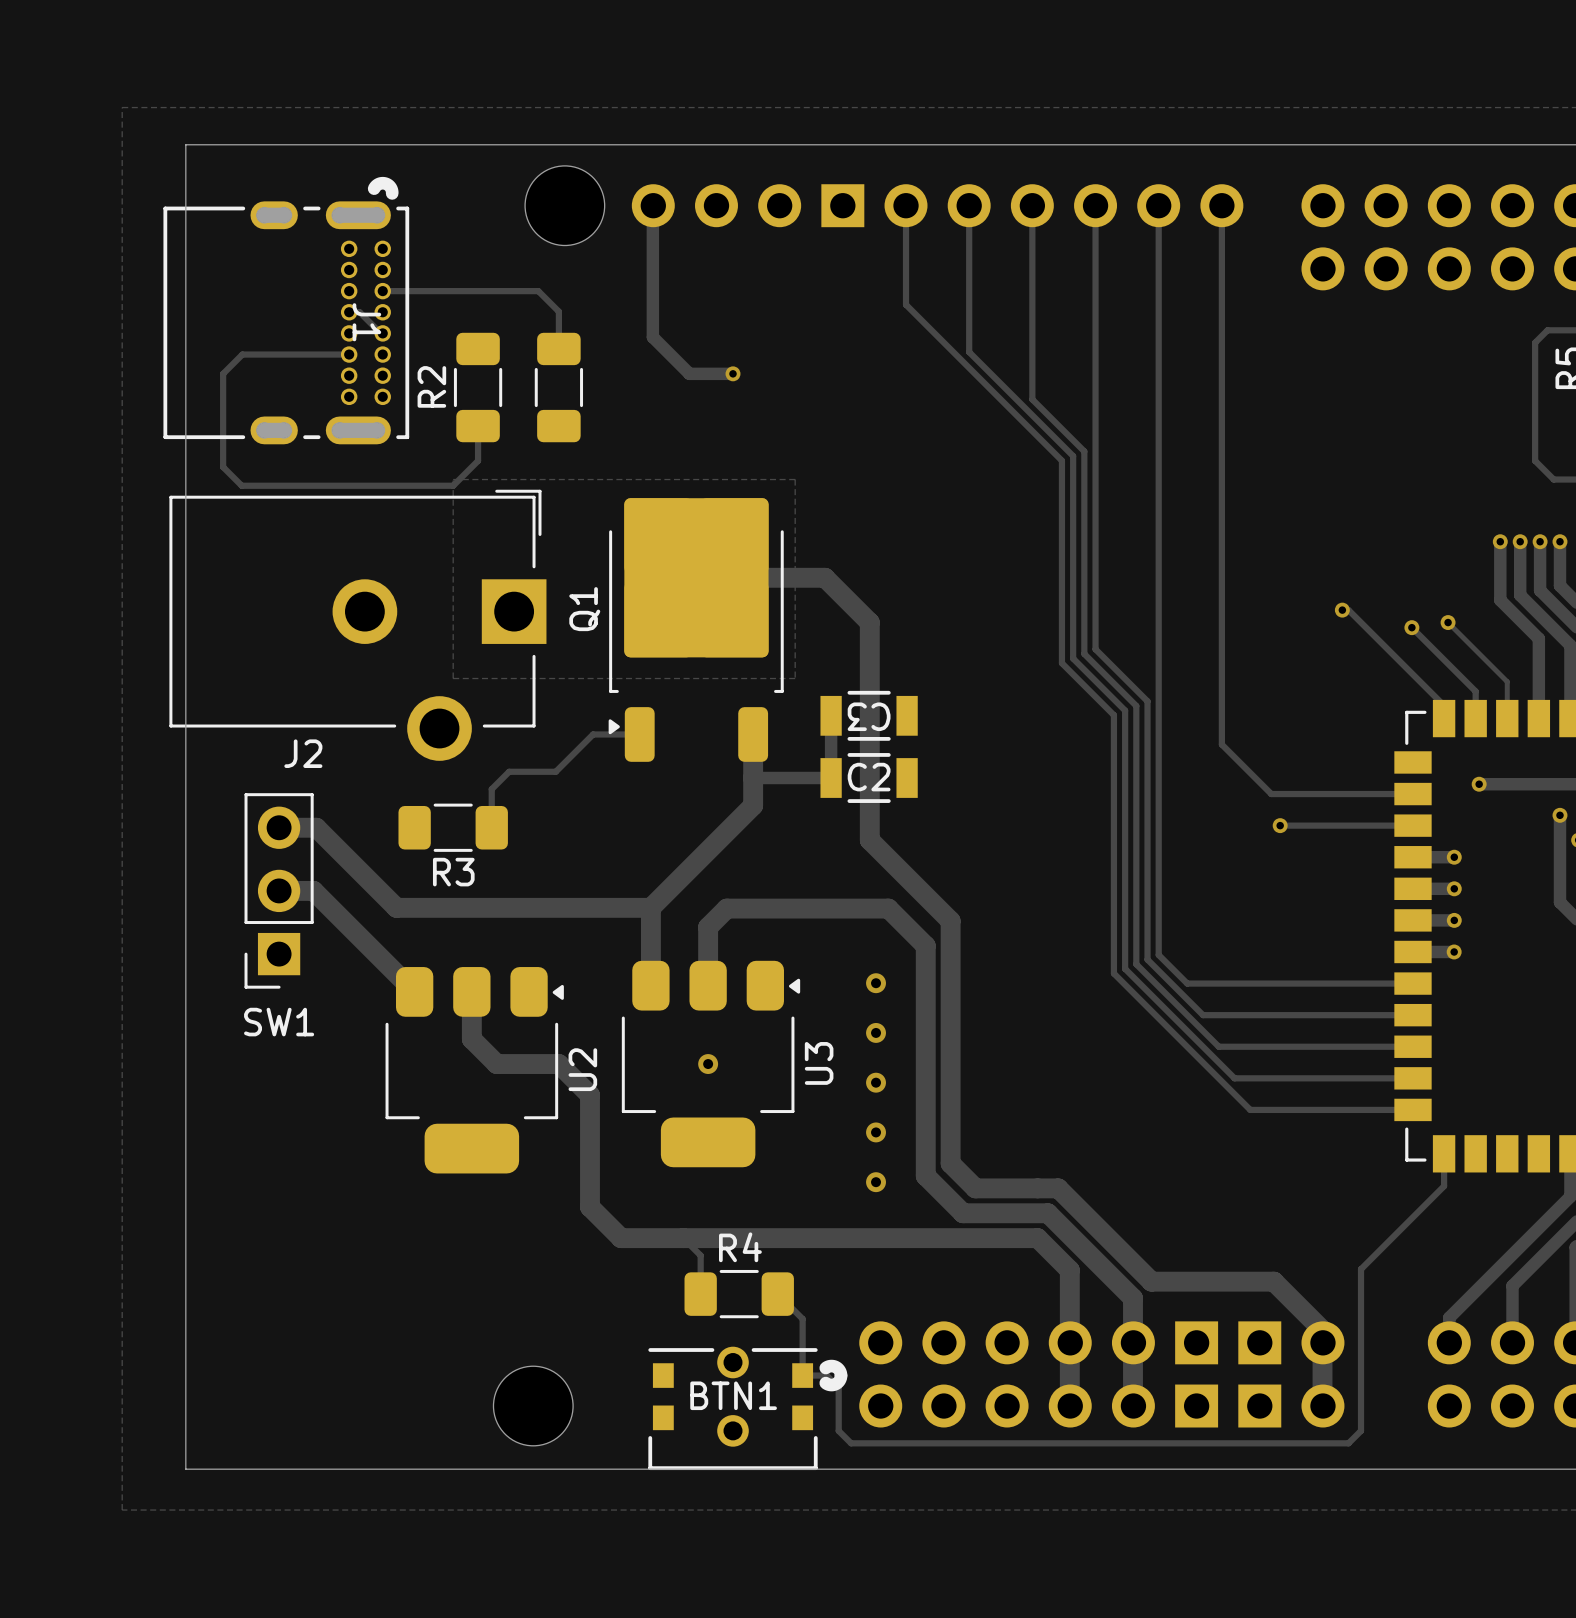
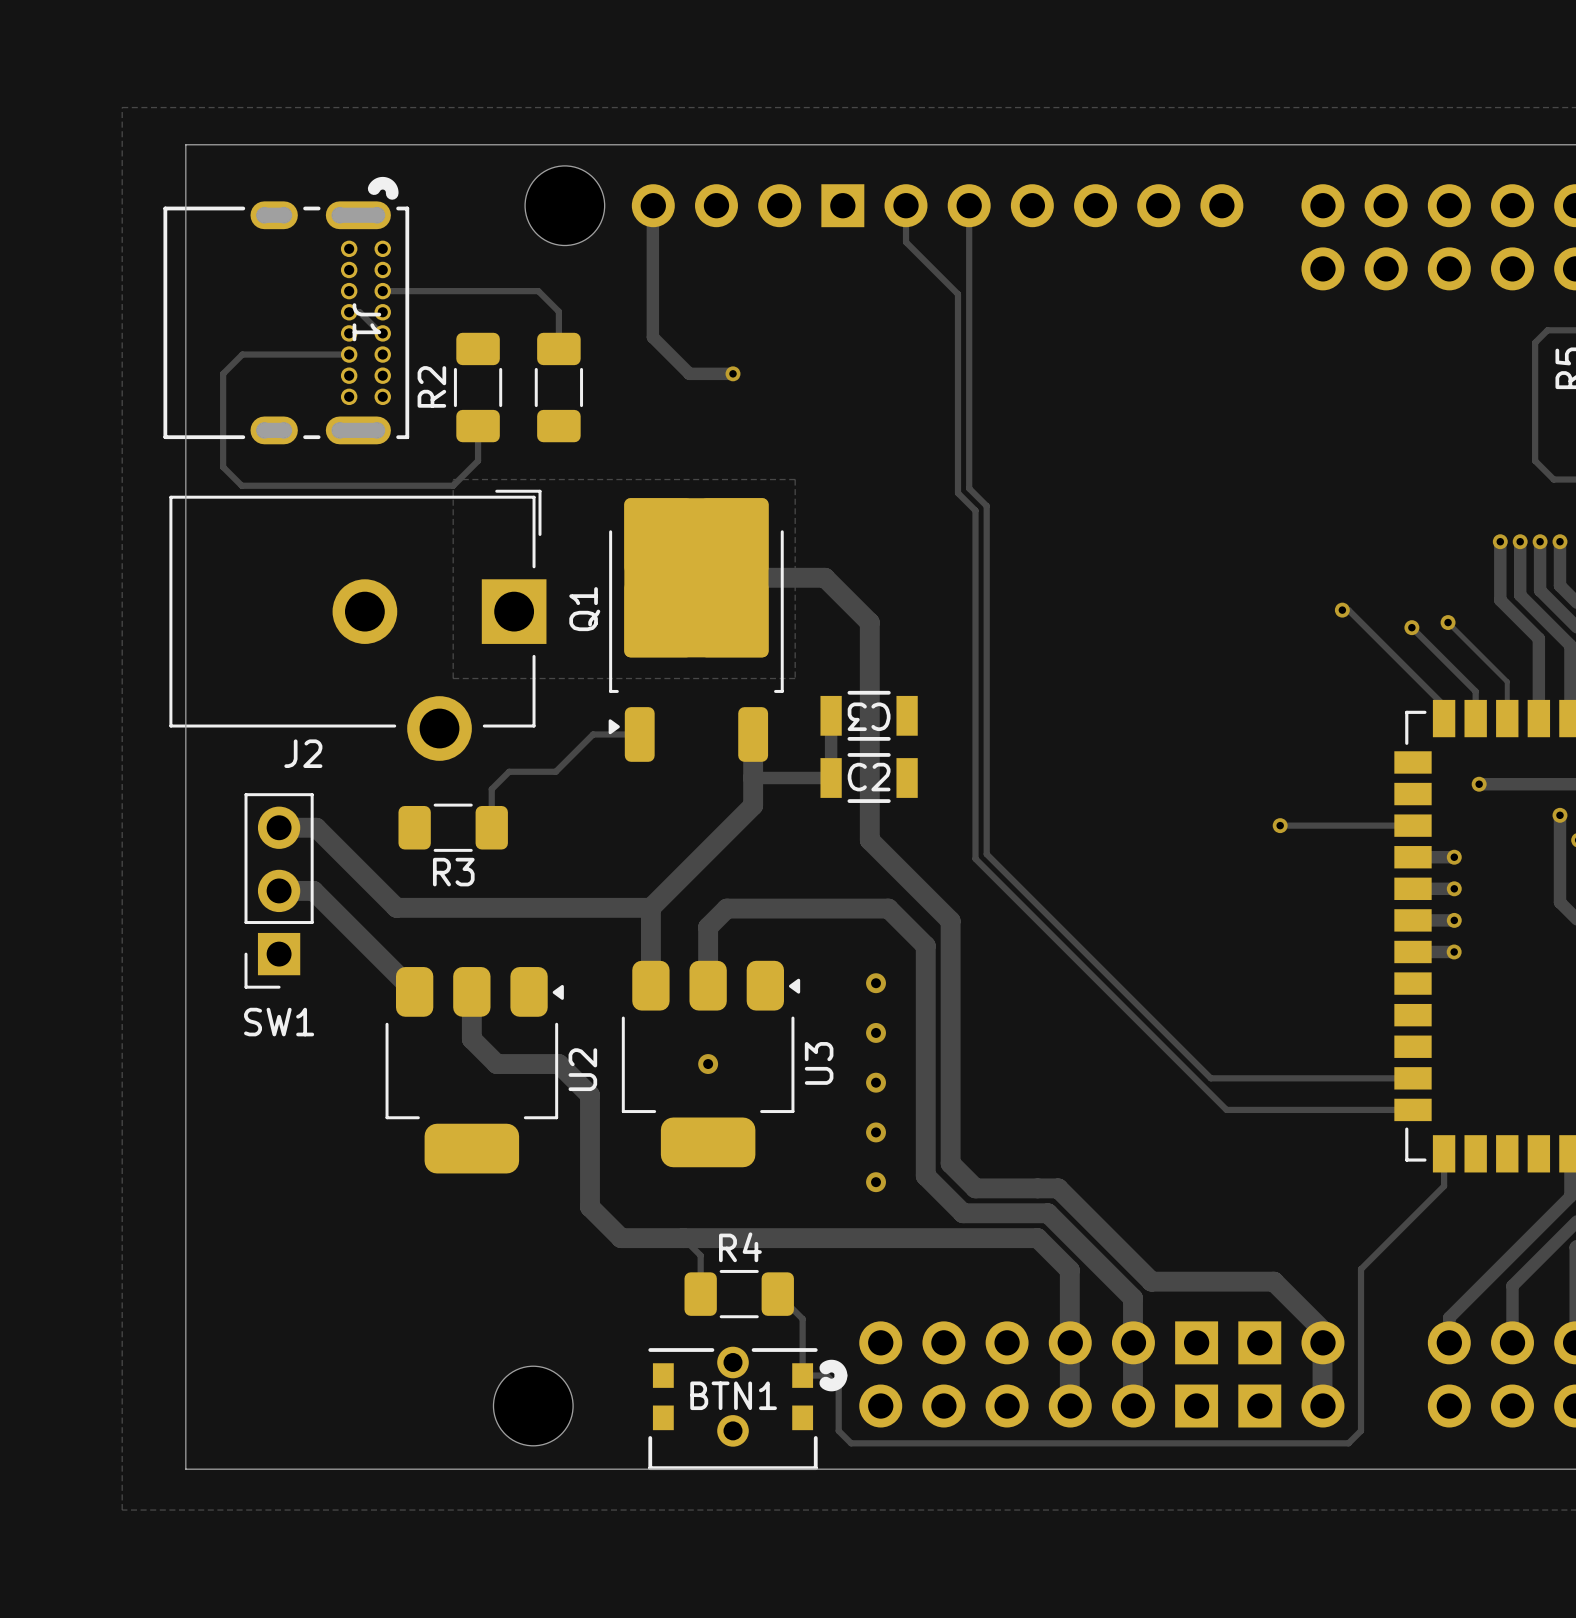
track: (1032, 205) (1032, 399) (1084, 451) (1084, 653) (1136, 705) (1136, 964) (1218, 1046) (1413, 1046) -> none
track: (1095, 205) (1095, 649) (1147, 701) (1147, 959) (1203, 1015) (1413, 1015) -> none
track: (1158, 205) (1158, 954) (1187, 983) (1413, 983) -> none
track: (1221, 205) (1221, 744) (1271, 794) (1413, 794) -> none
track: (906, 242) (906, 304) (1061, 460) (1061, 663) (1113, 715) (1113, 973) (1250, 1109) -> (906, 242) (957, 294) (957, 493) (975, 510) (975, 858) (1226, 1109) (1250, 1109)
track: (969, 352) (1073, 456) (1073, 658) (1125, 710) (1125, 968) (1234, 1078) -> (969, 352) (969, 488) (986, 505) (986, 854) (1210, 1078) (1234, 1078)

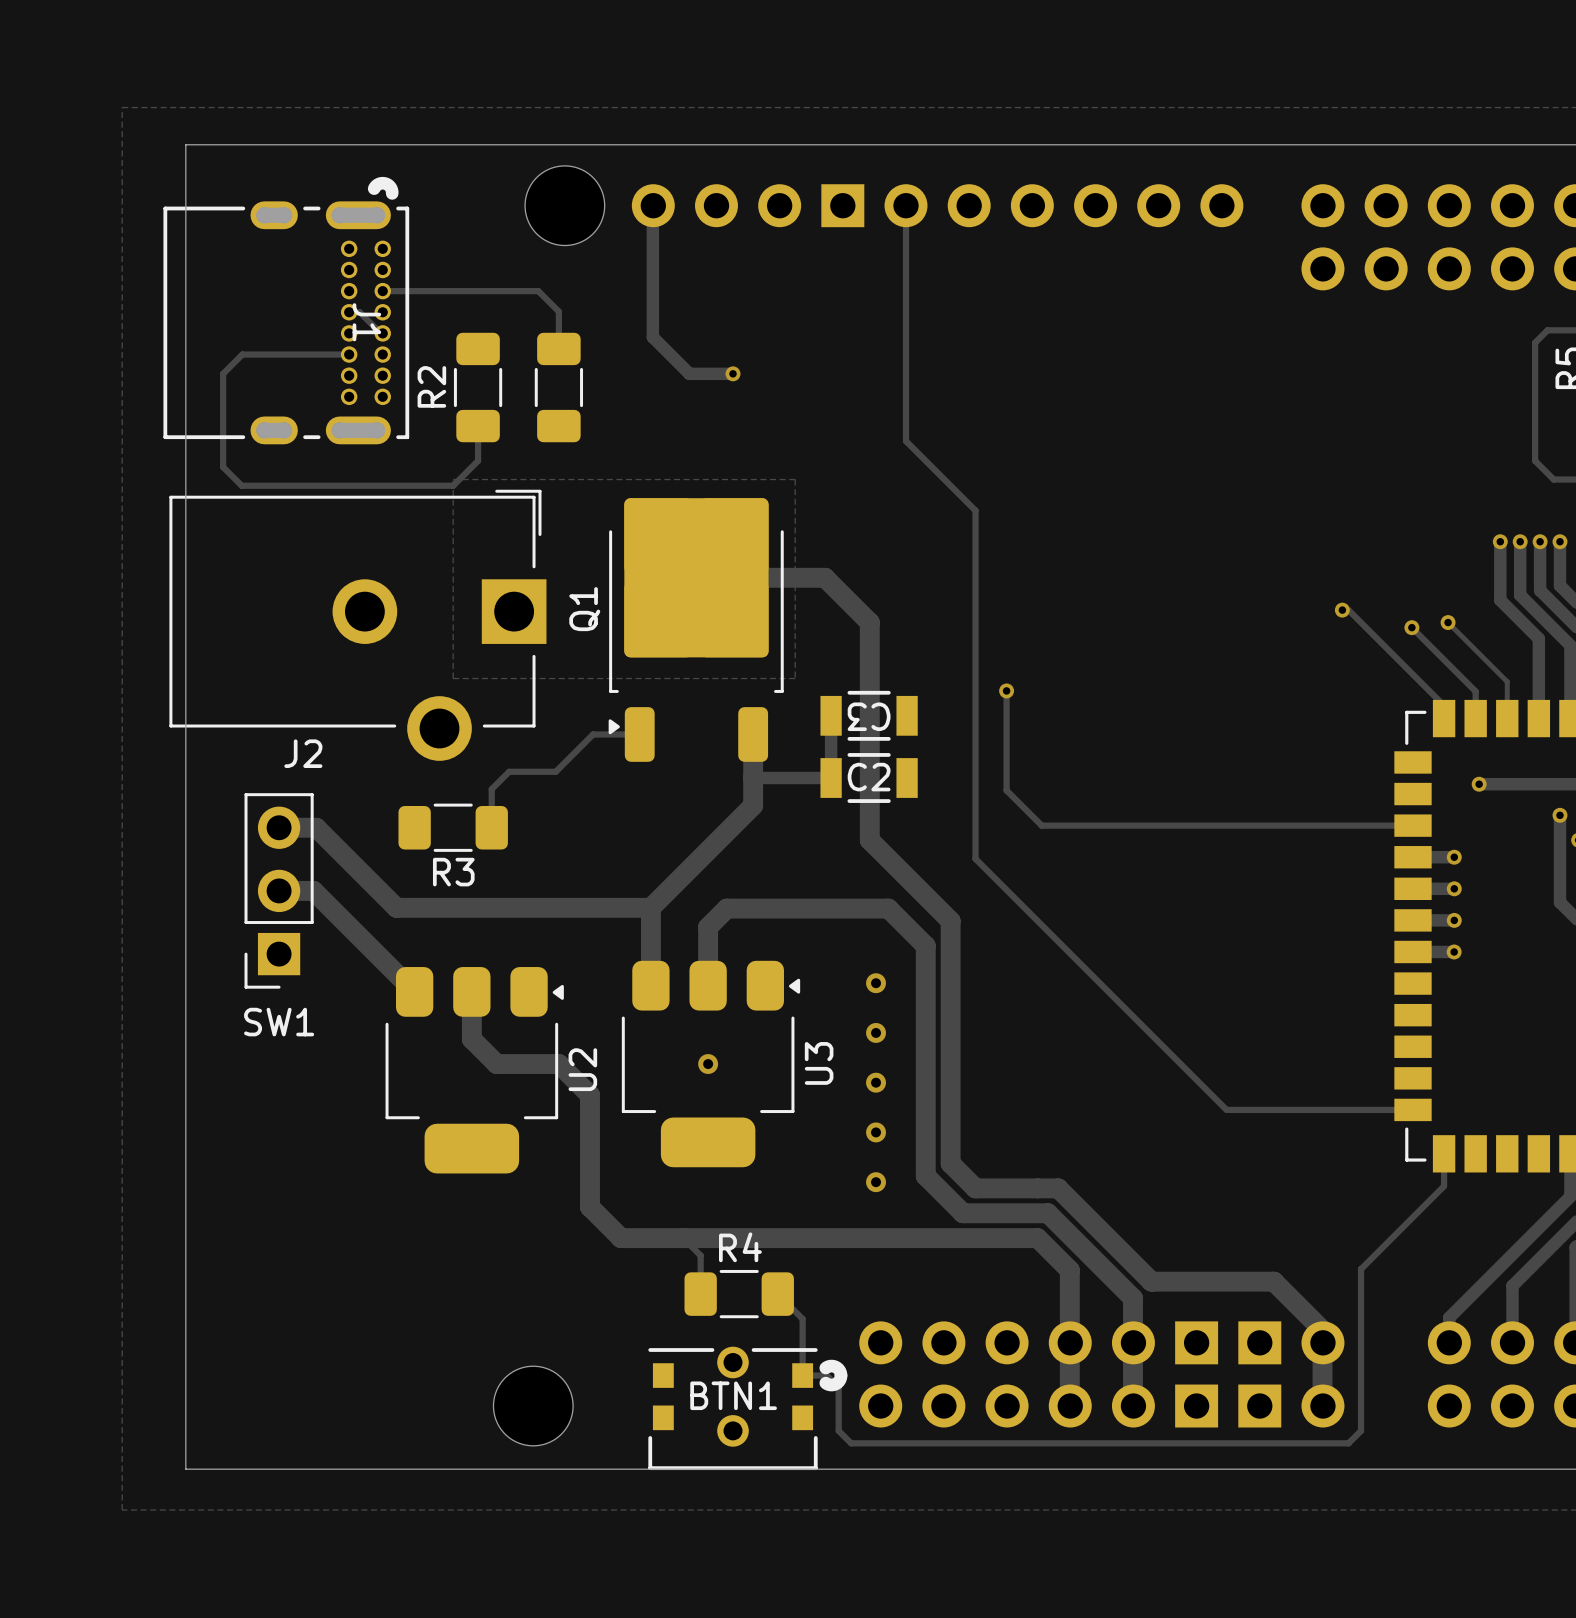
track: (969, 205) (969, 488) (986, 505) (986, 854) (1210, 1078) (1413, 1078) -> none
track: (906, 242) (957, 294) (957, 493) -> (906, 242) (906, 441) (957, 493)
track: none -> (1006, 690) (1006, 790) (1041, 825) (1280, 825)
via: none -> (1006, 690)
via: (1280, 825) -> none

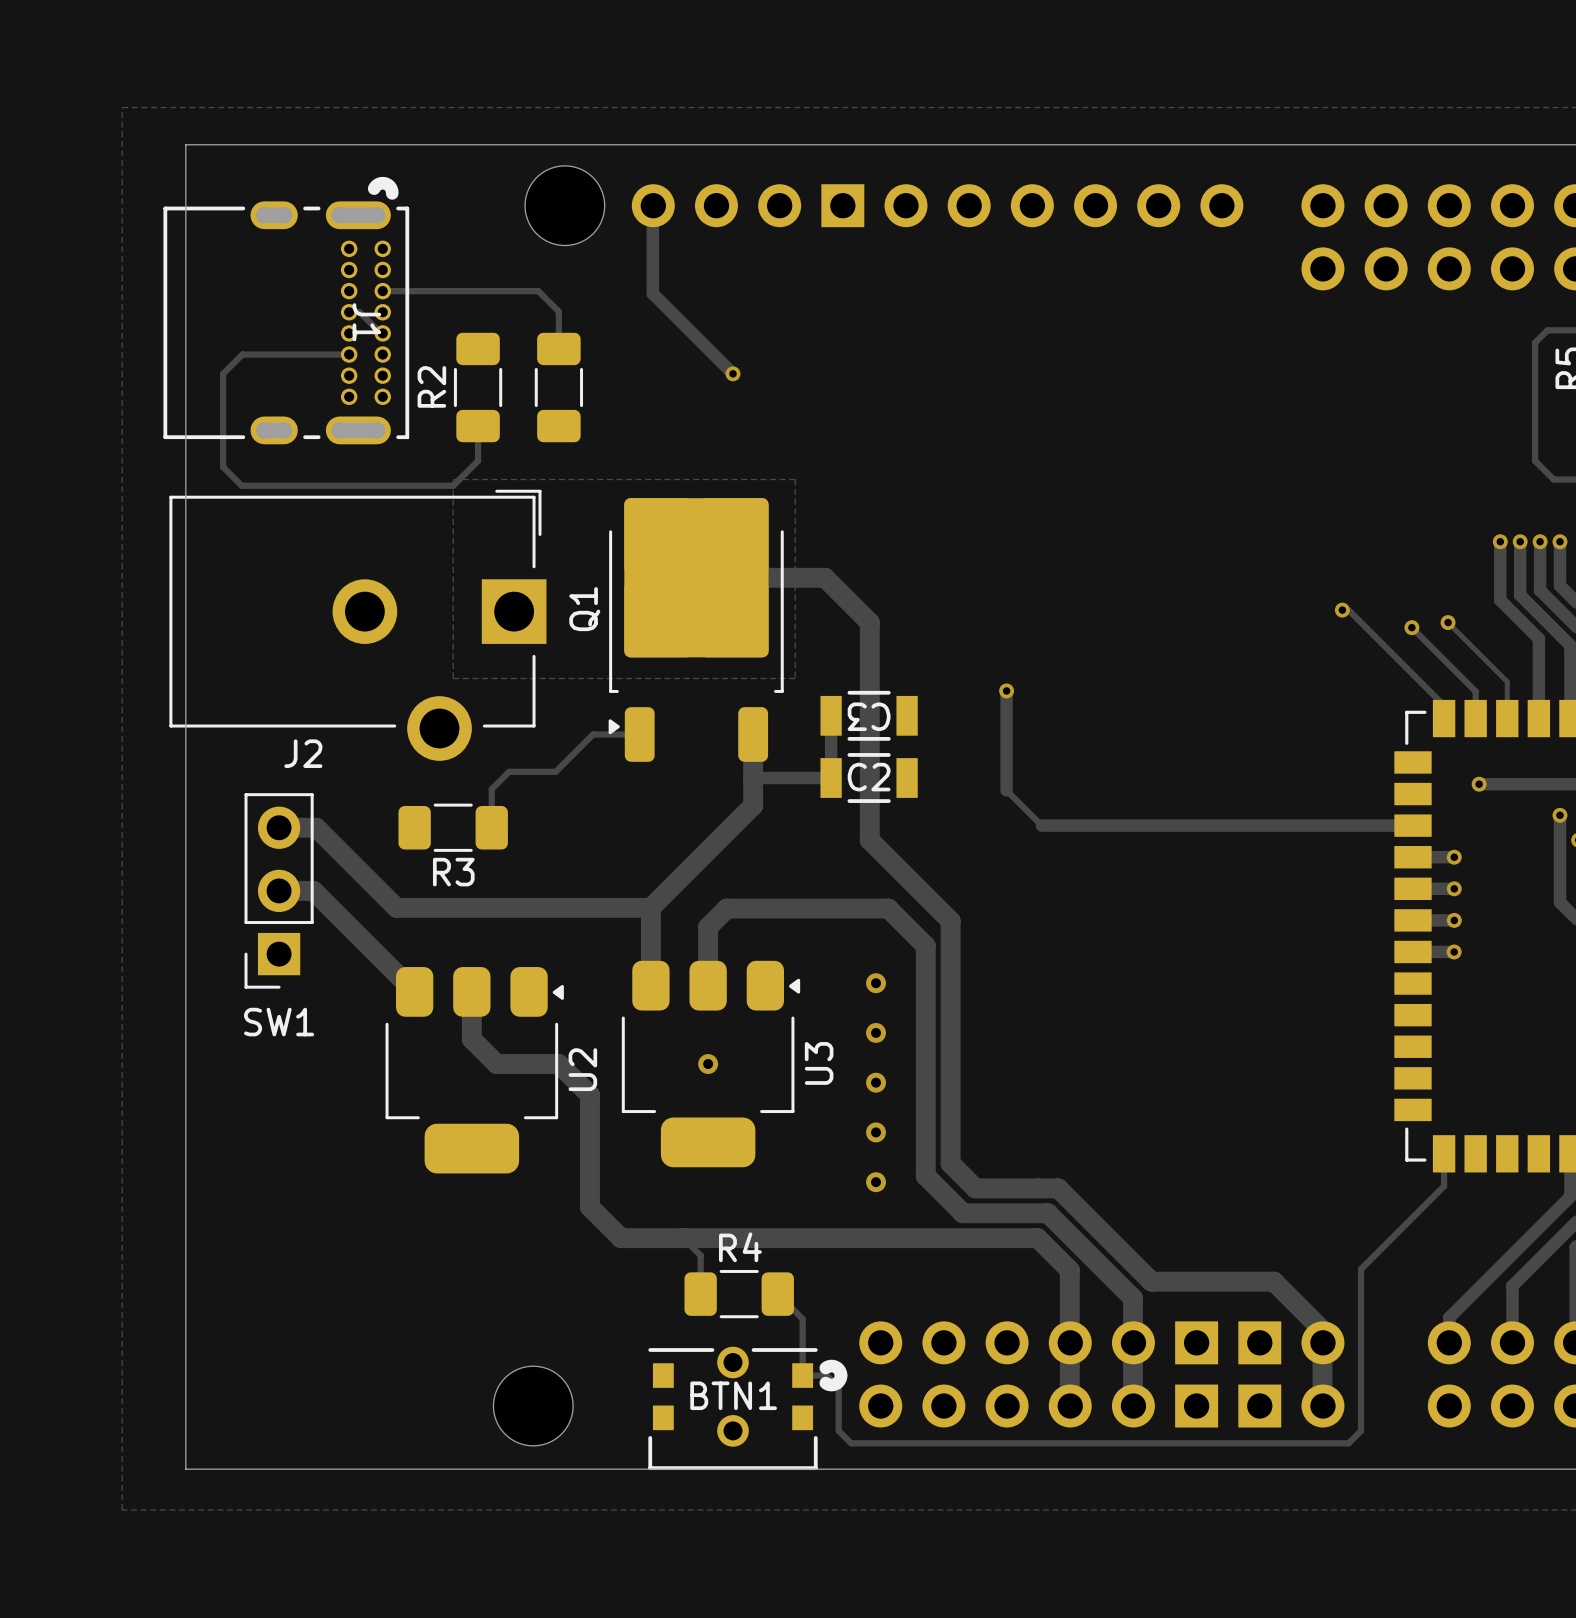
track: (906, 205) (906, 441) (975, 510) (975, 858) (1226, 1109) (1413, 1109) -> none
track: (652, 293) (652, 337) (689, 373) (733, 373) -> (652, 293) (733, 373)
track width: thin (1006, 690) (1006, 790) -> thick (1006, 690) (1006, 790)
track width: thin (1041, 825) (1413, 825) -> thick (1041, 825) (1413, 825)

